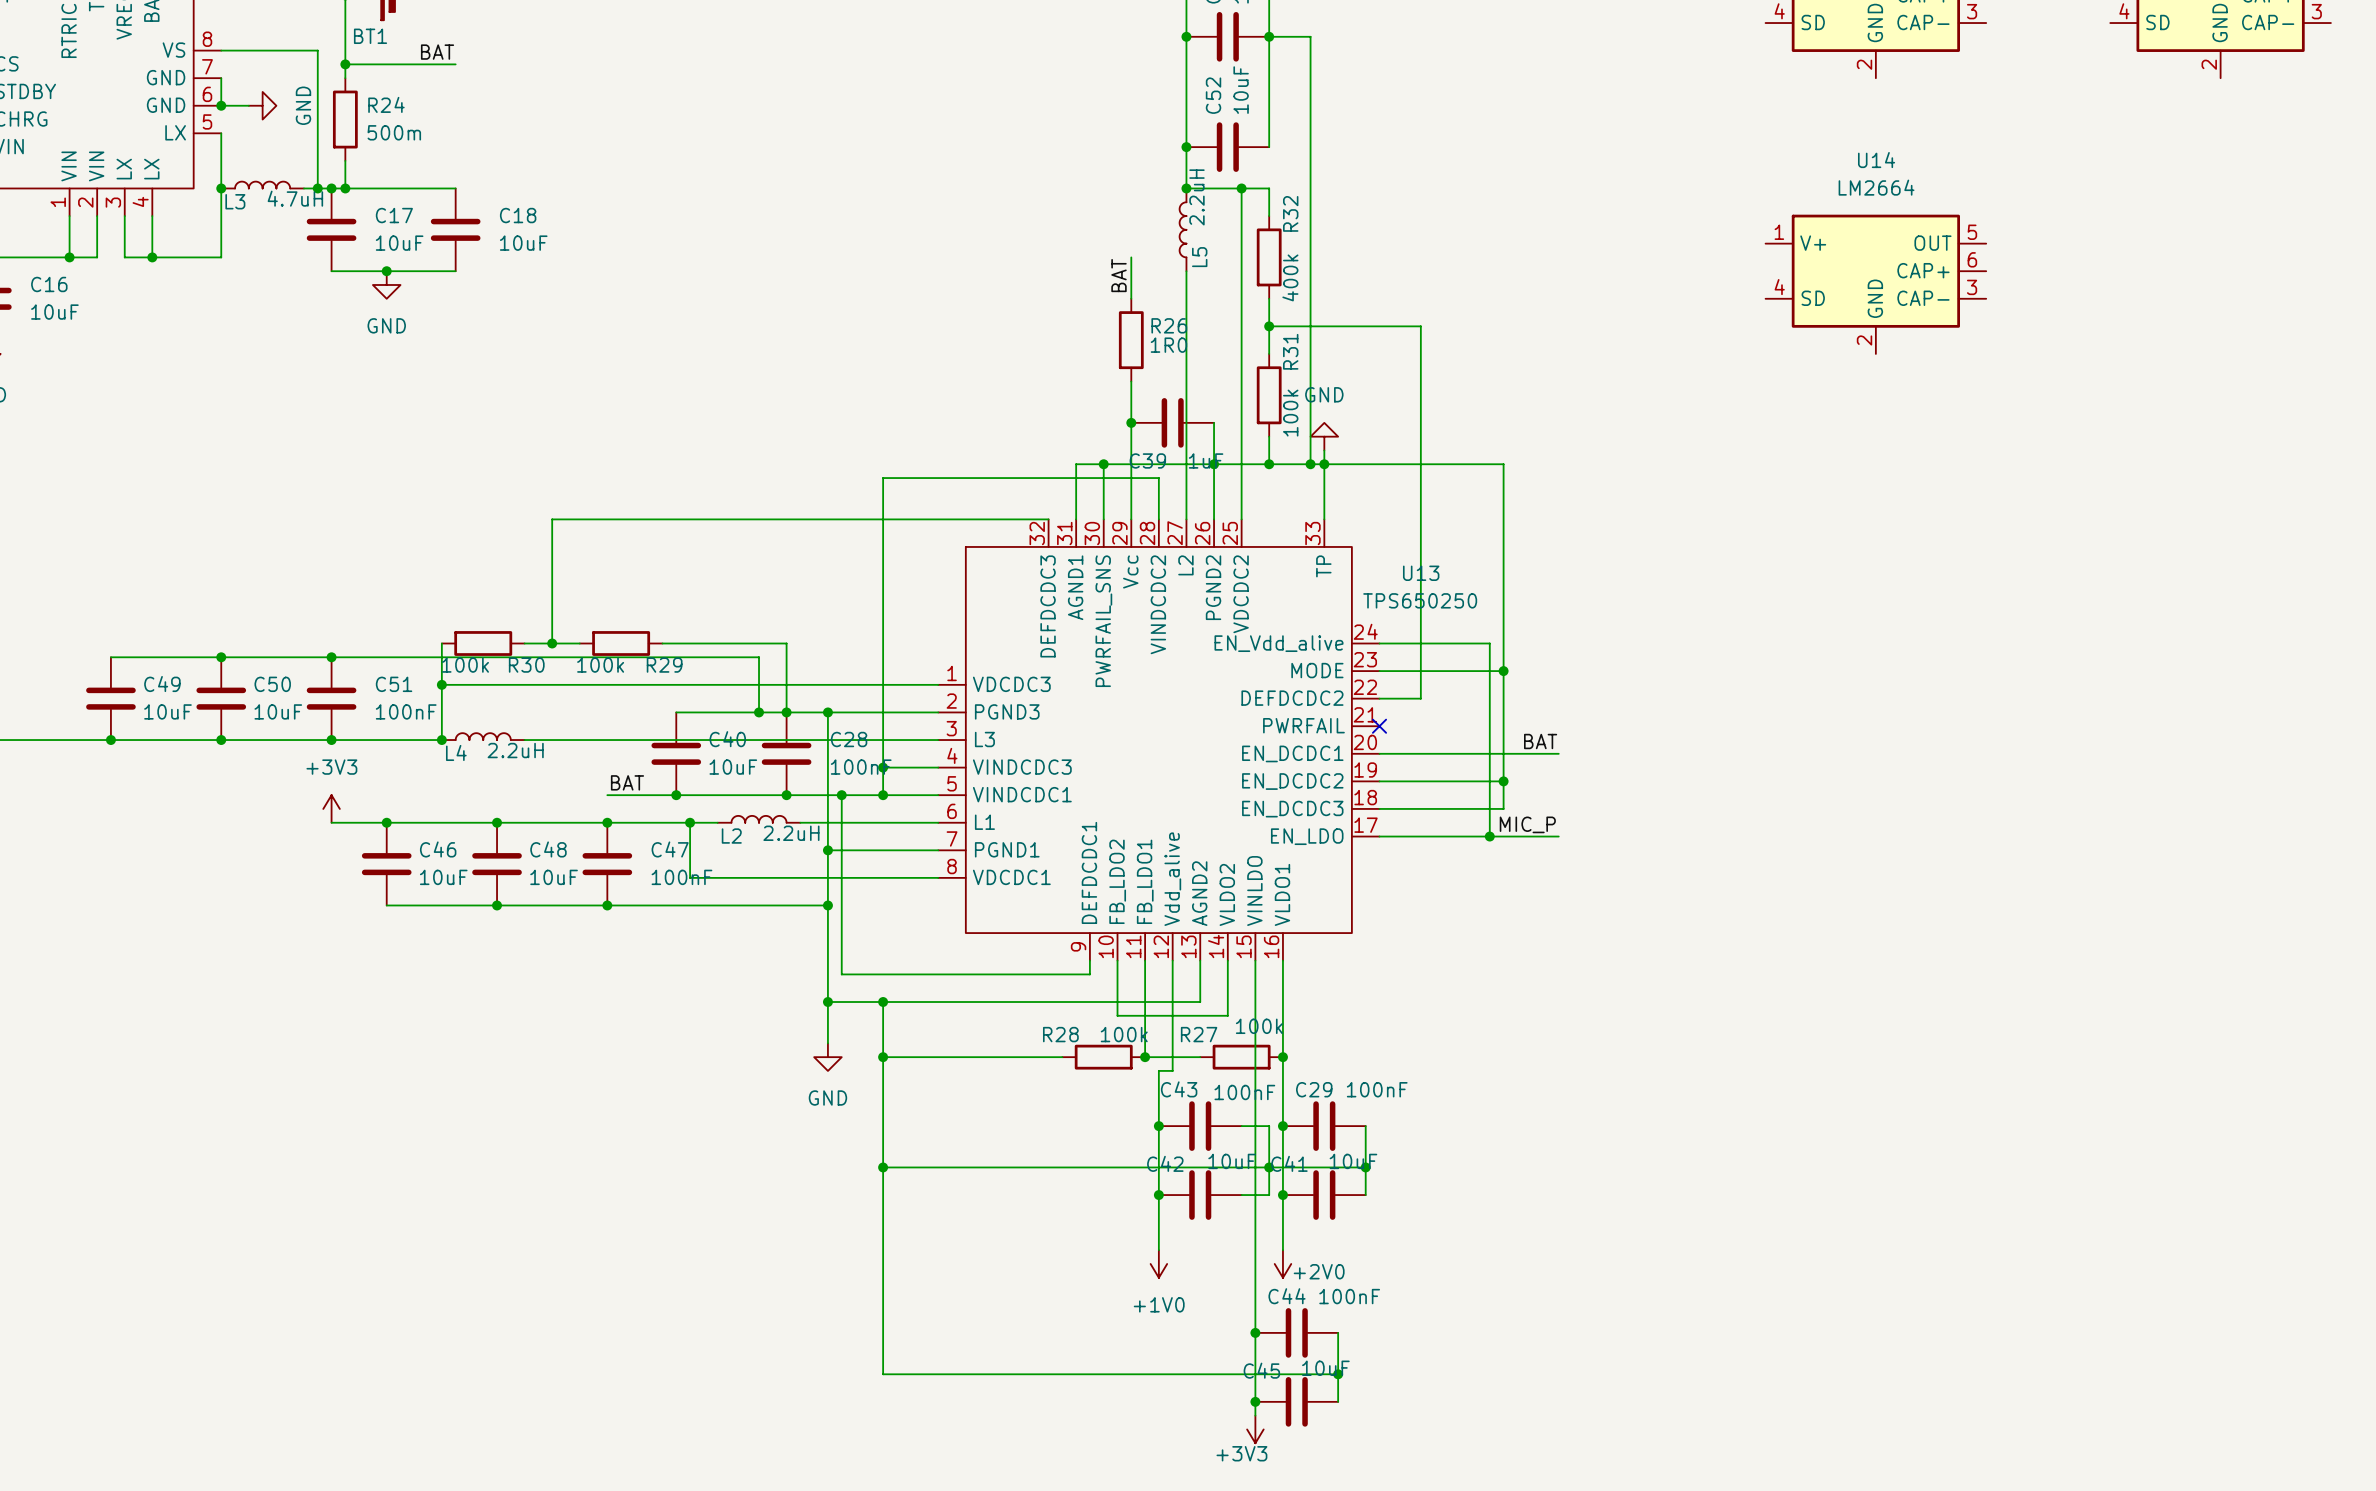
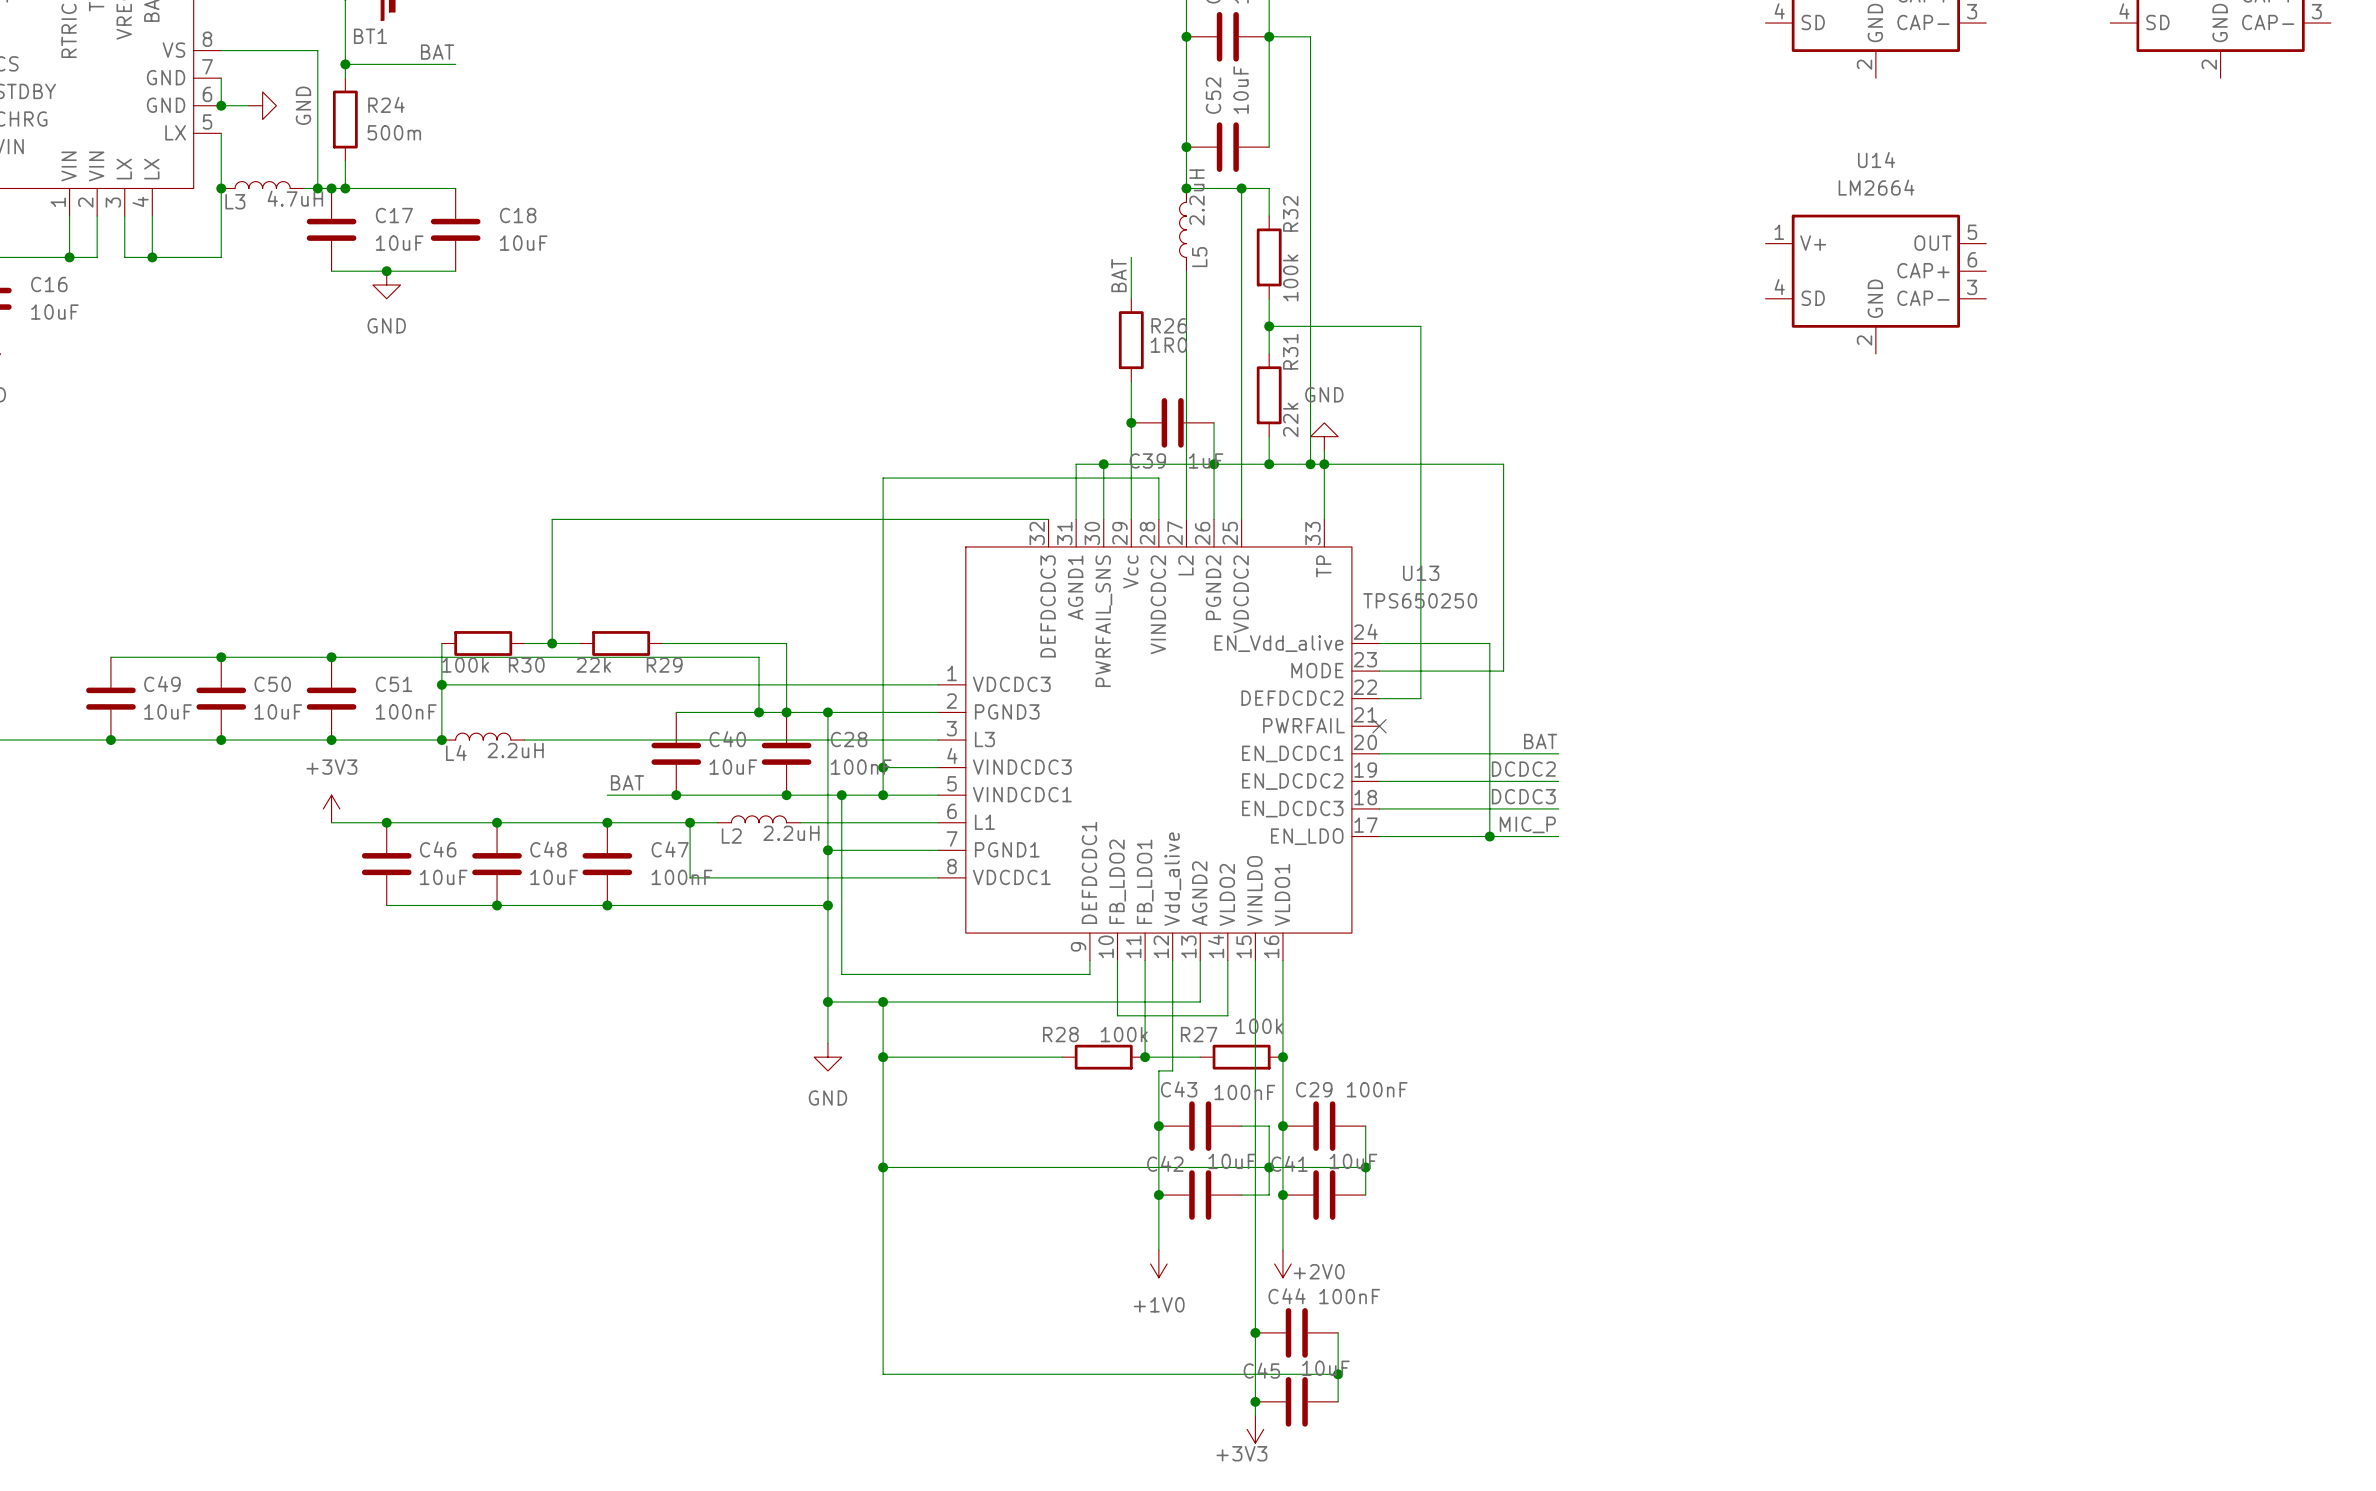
R32 value: 400k (1290, 277) -> 100k (1290, 277)
R31 value: 100k (1290, 413) -> 22k (1290, 419)
R29 value: 100k (600, 665) -> 22k (593, 665)
wire: (1503, 671) (1503, 808) -> (1558, 808) (1503, 808)
junction: (1503, 671) -> none
label: none -> DCDC2 (1523, 769)
wire: none -> (1503, 781) (1558, 781)
junction: (1503, 781) -> none
label: none -> DCDC3 (1523, 796)

